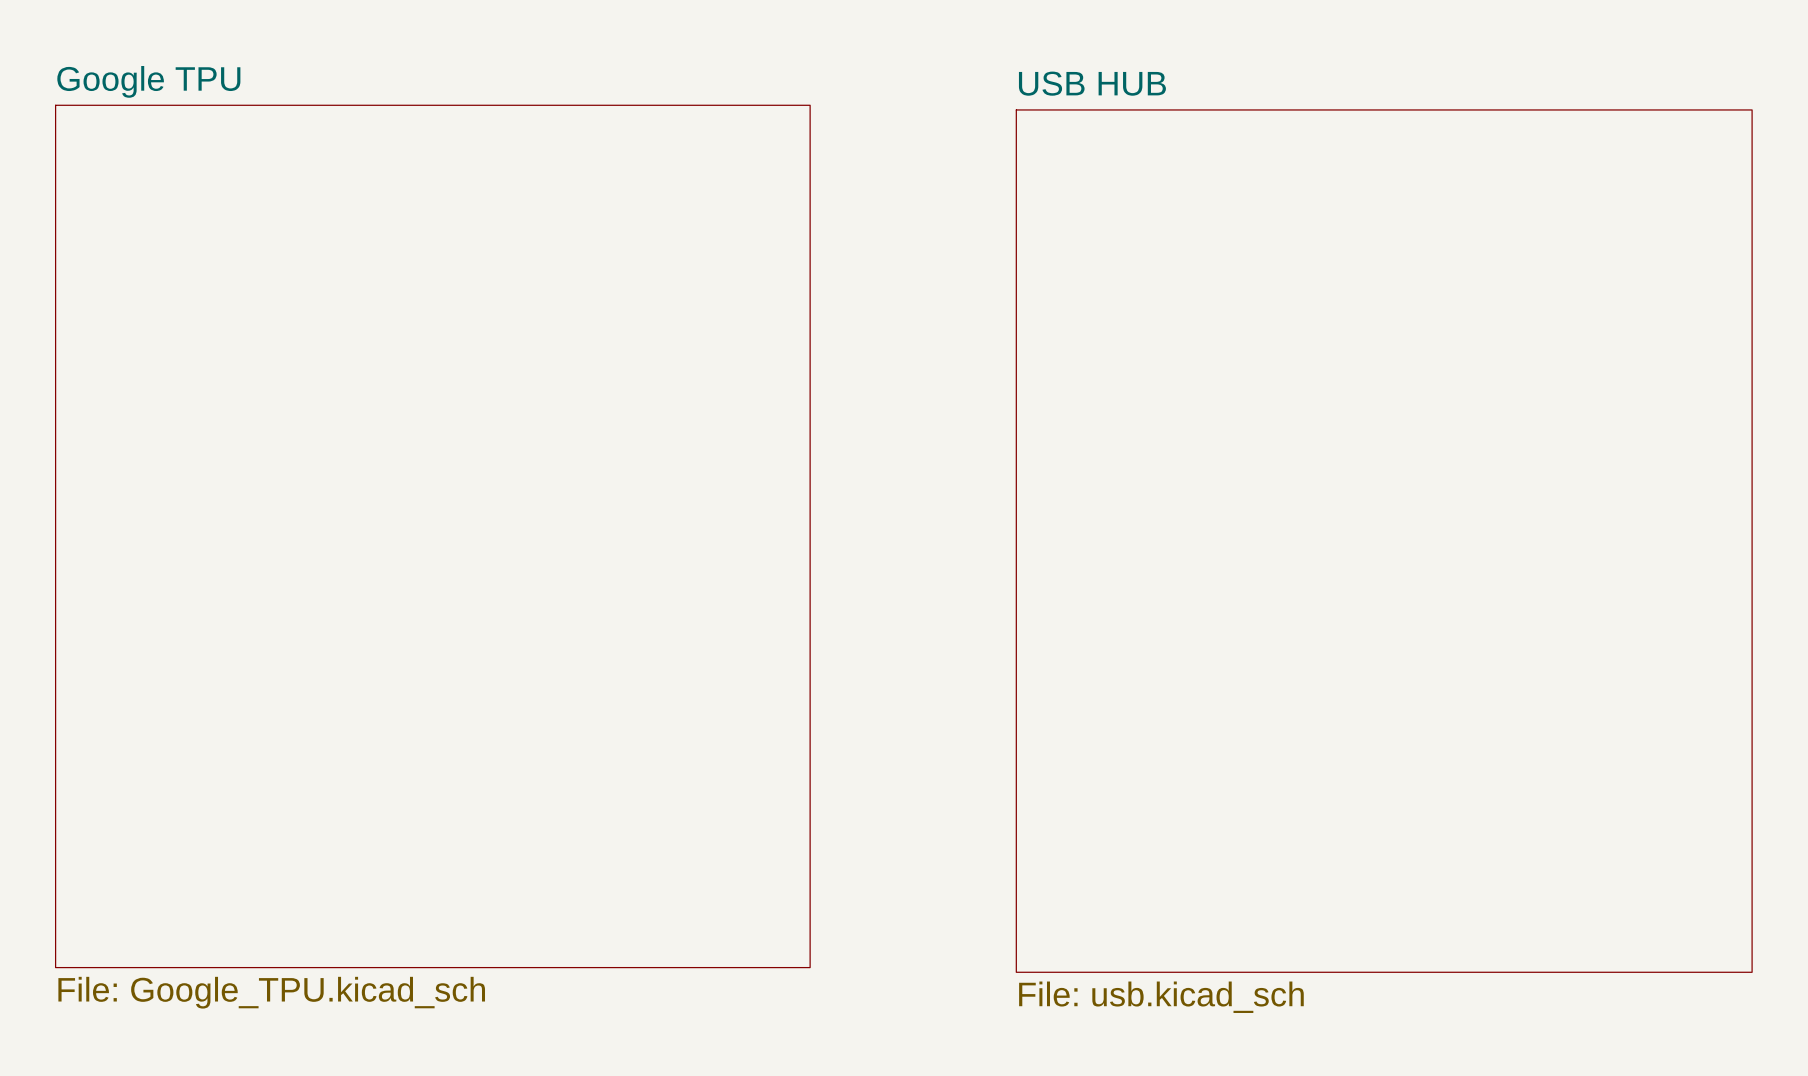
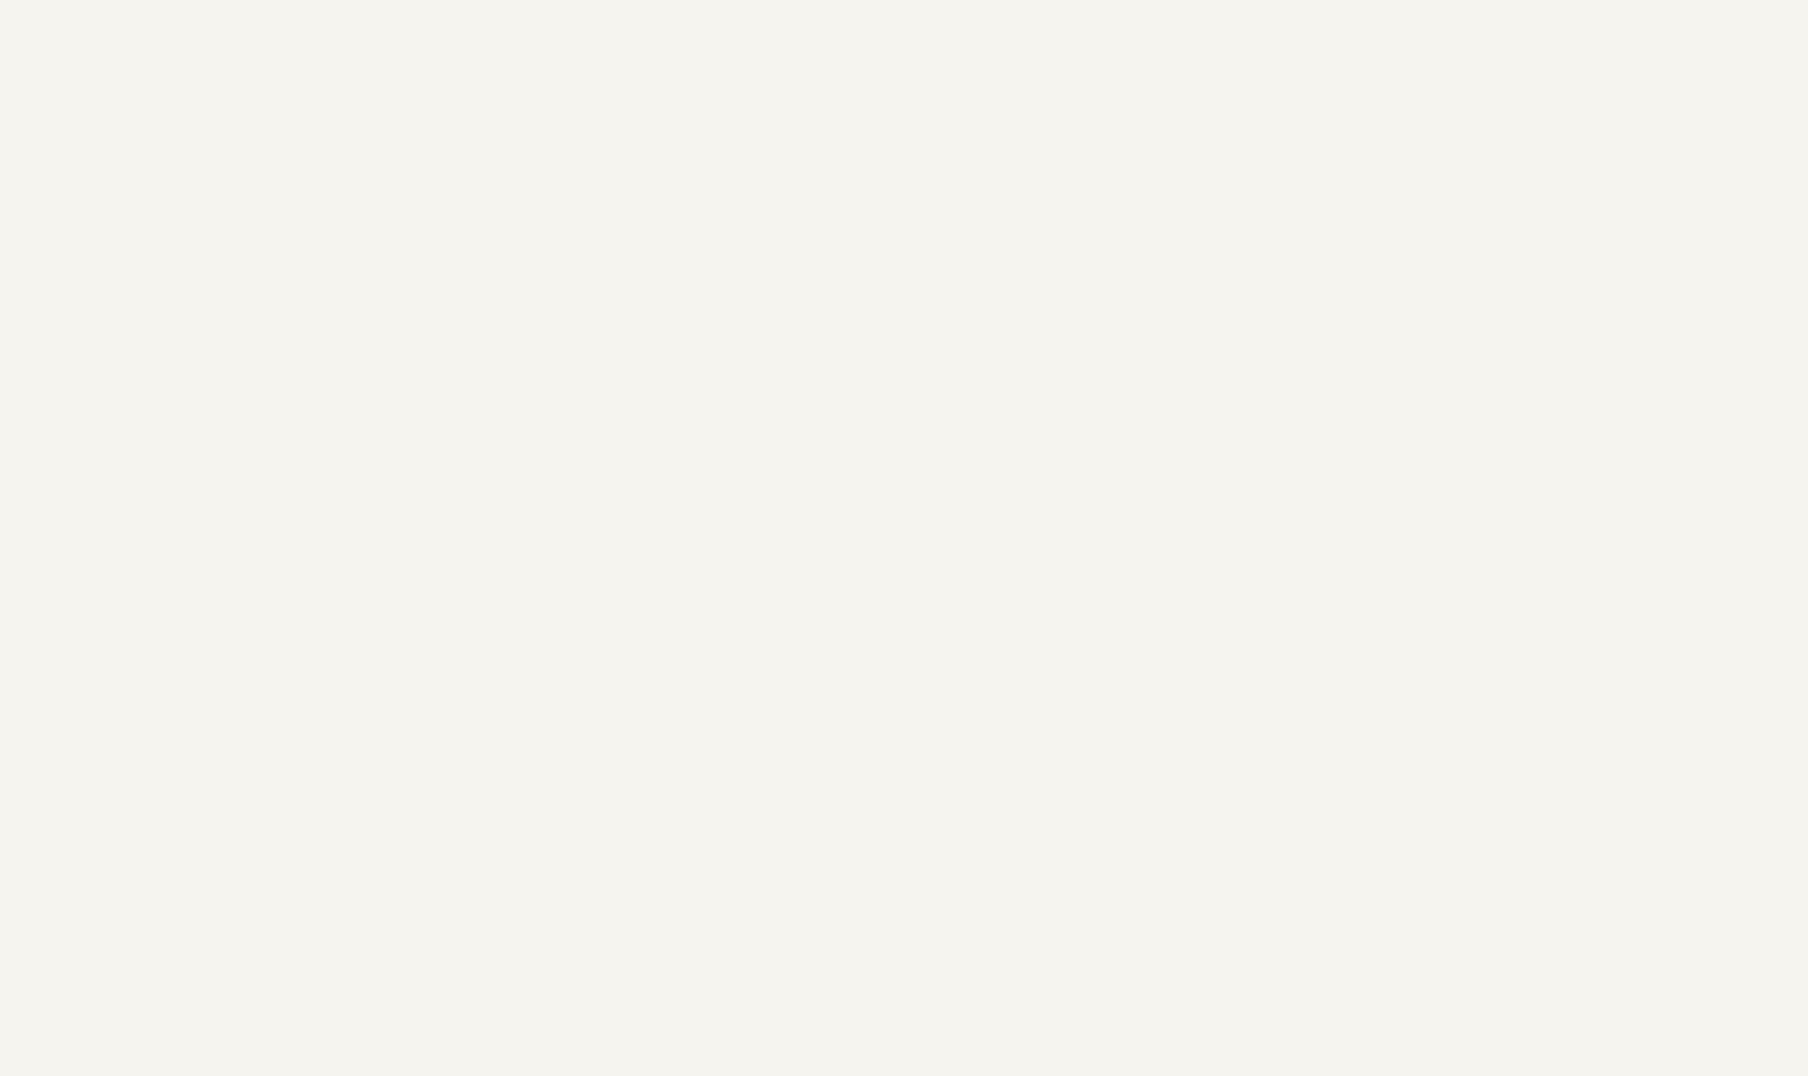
sheet Google TPU: File: Google_TPU.kicad_sch (432, 536) -> none
sheet USB HUB: File: usb.kicad_sch (1384, 541) -> none

